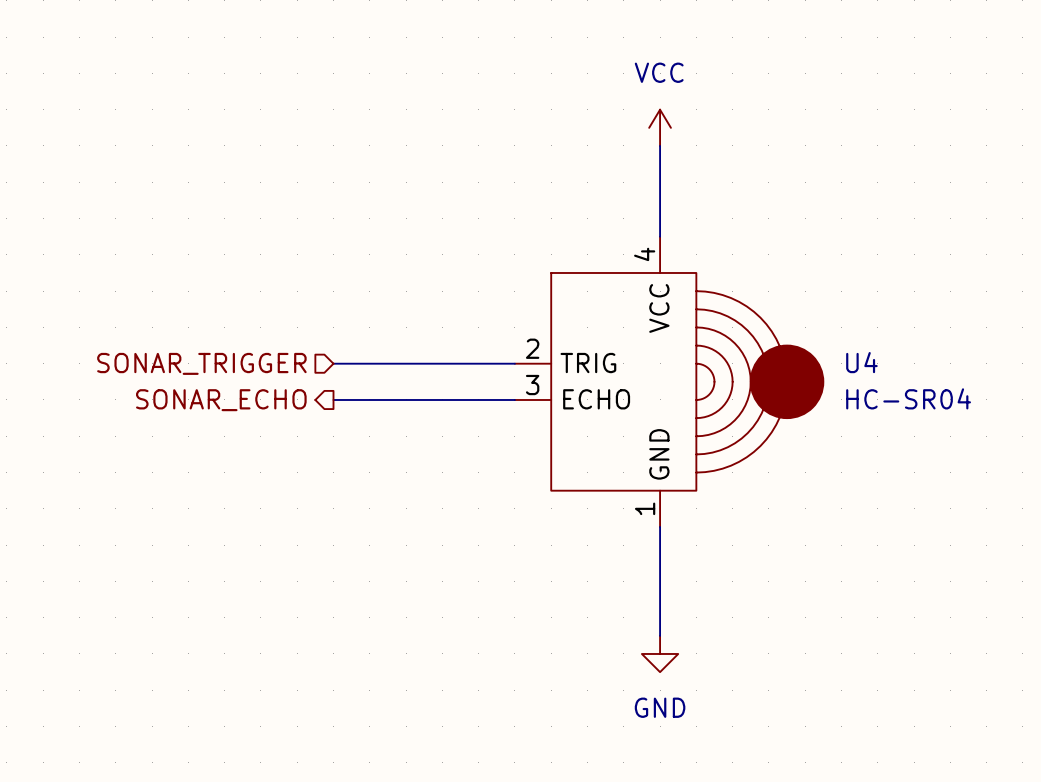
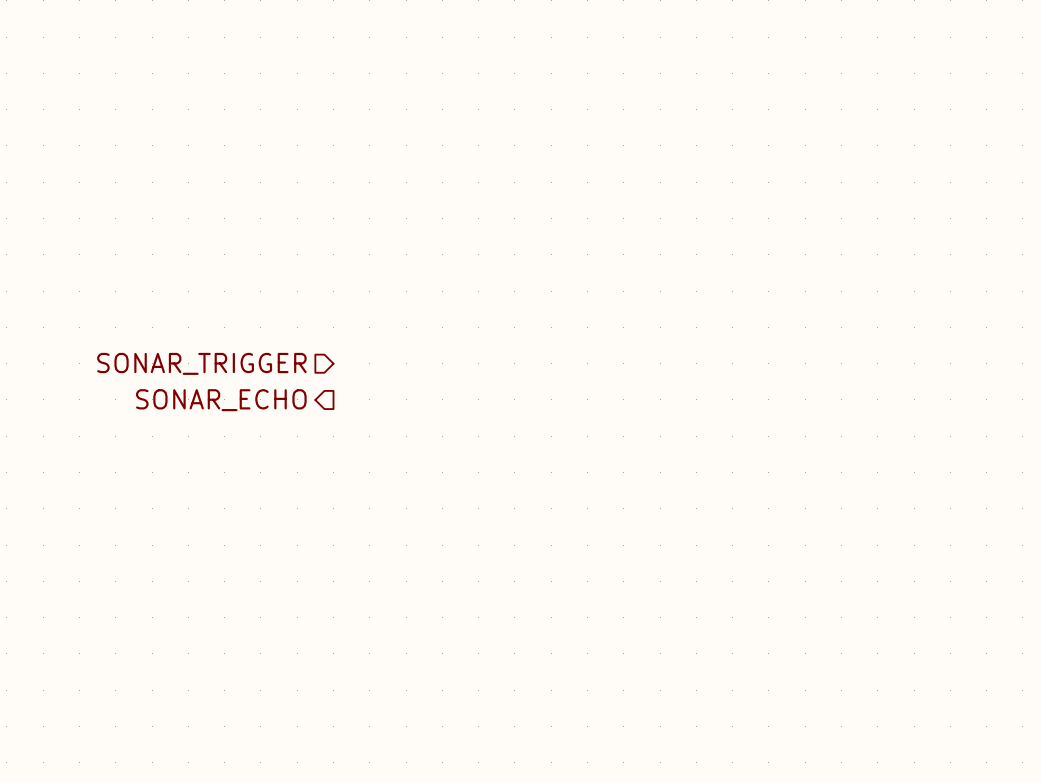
power symbol: VCC (660, 127) -> none
wire: (660, 145) (660, 236) -> none
wire: (333, 363) (514, 363) -> none
U4: HC-SR04 (669, 381) -> none
wire: (333, 399) (514, 399) -> none
wire: (660, 526) (660, 635) -> none
power symbol: GND (660, 653) -> none

